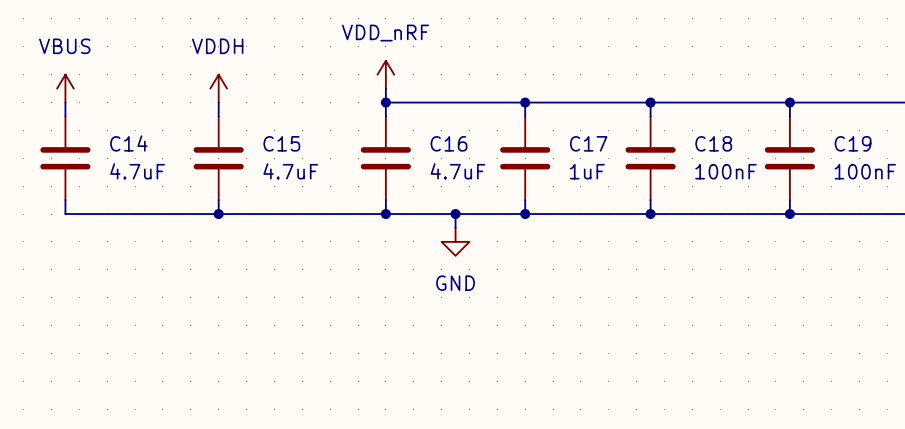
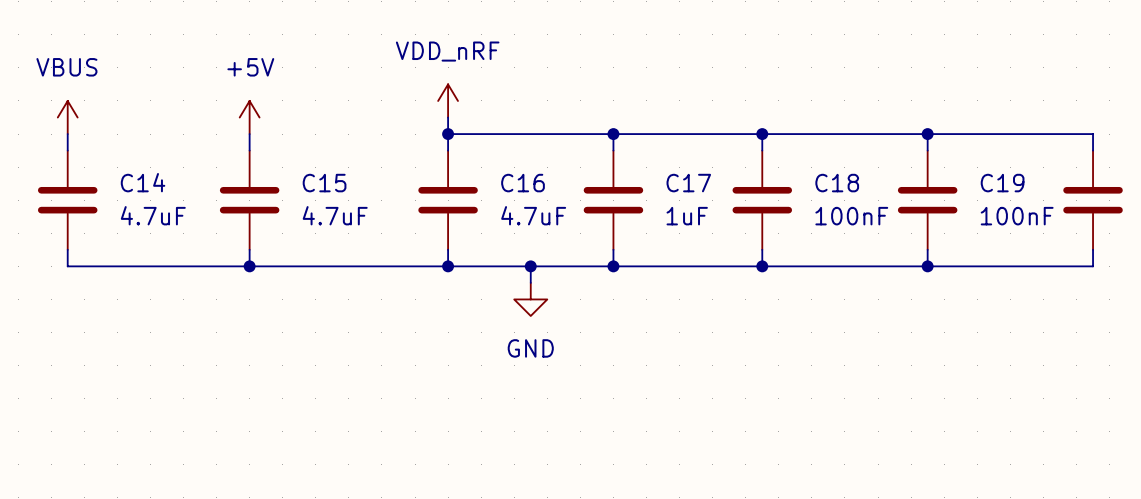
power symbol: VDDH (218, 88) -> +5V (249, 117)

